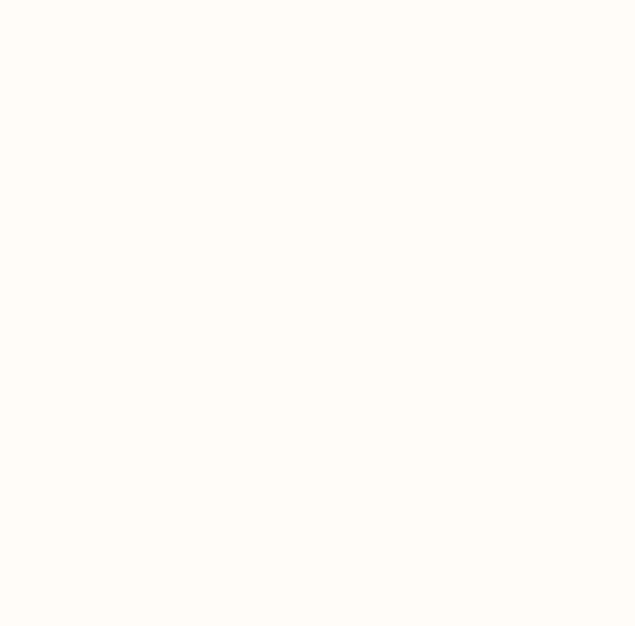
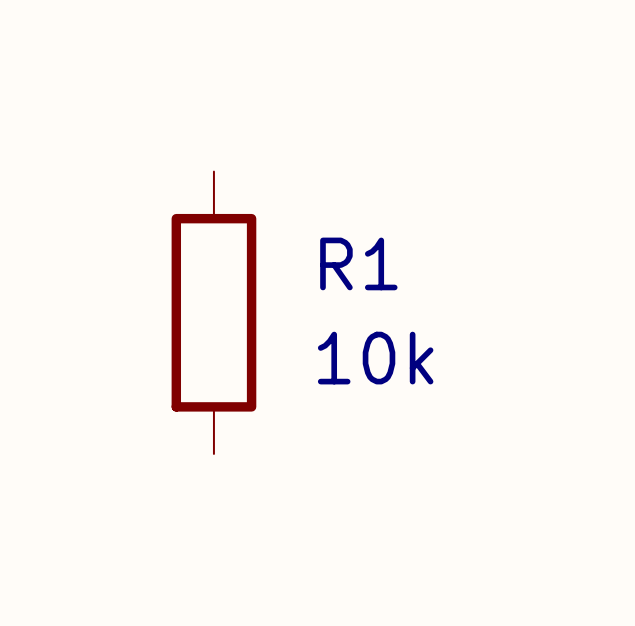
R1: none -> 10k (213, 312)

